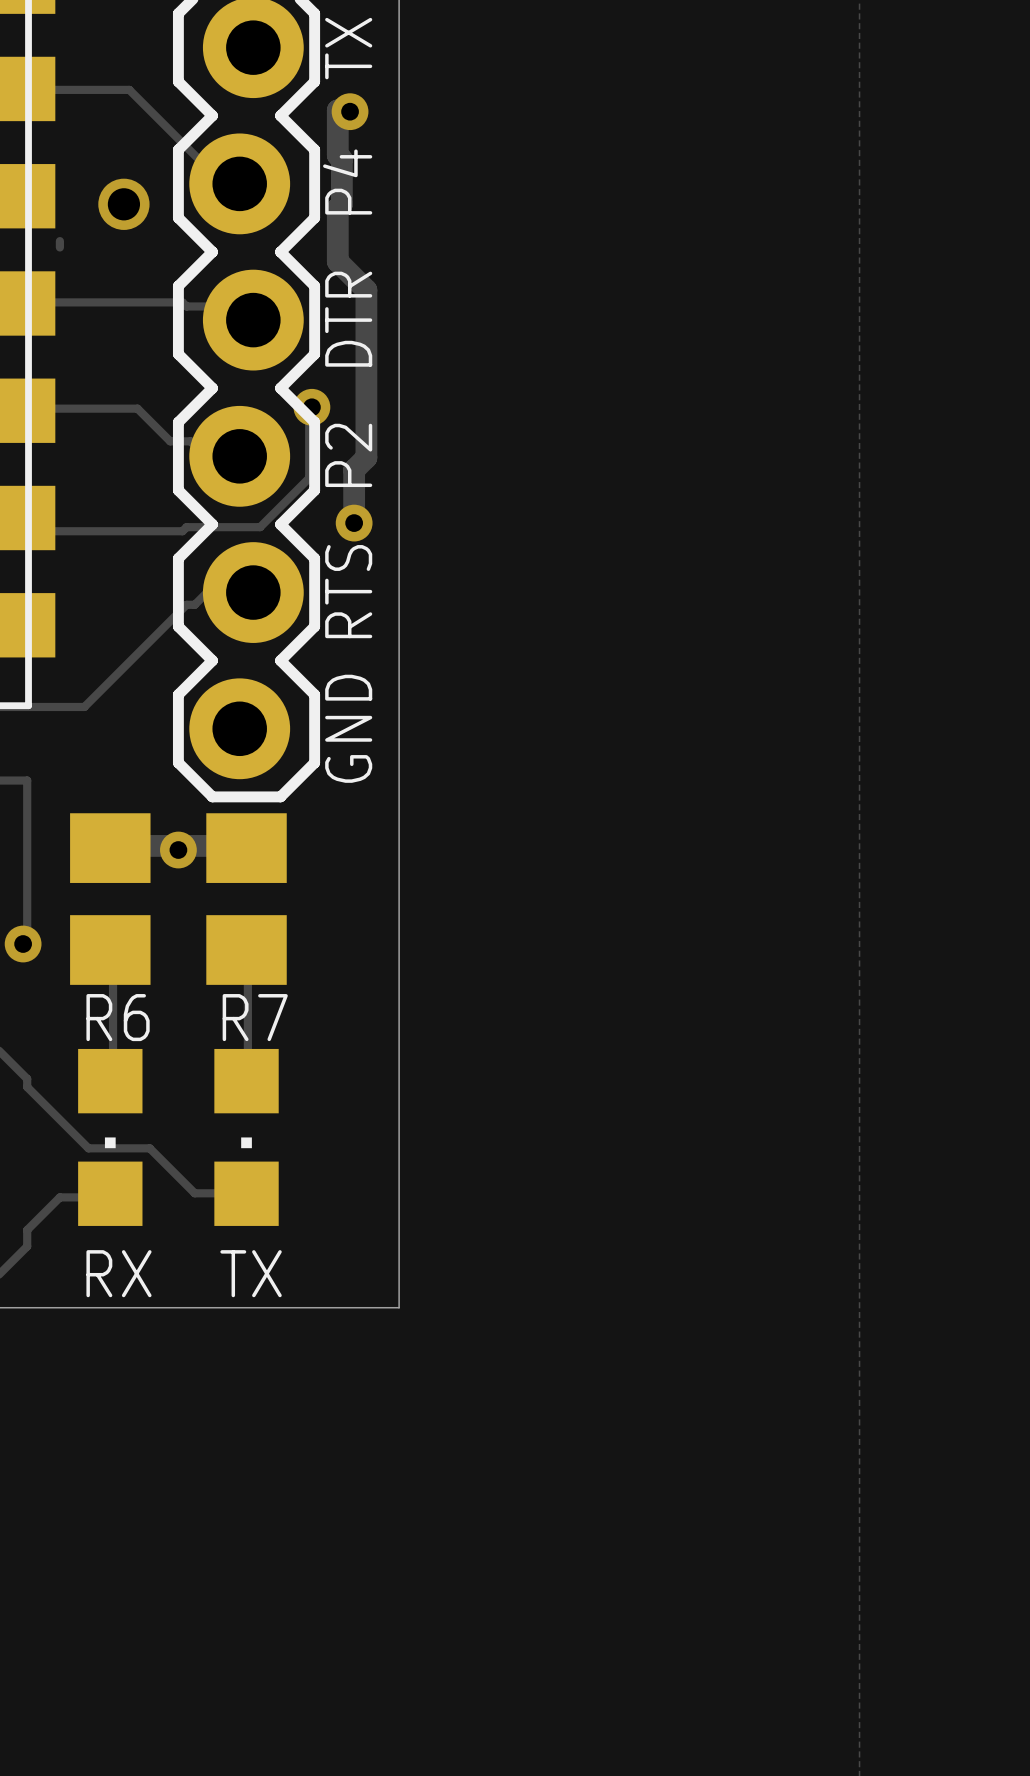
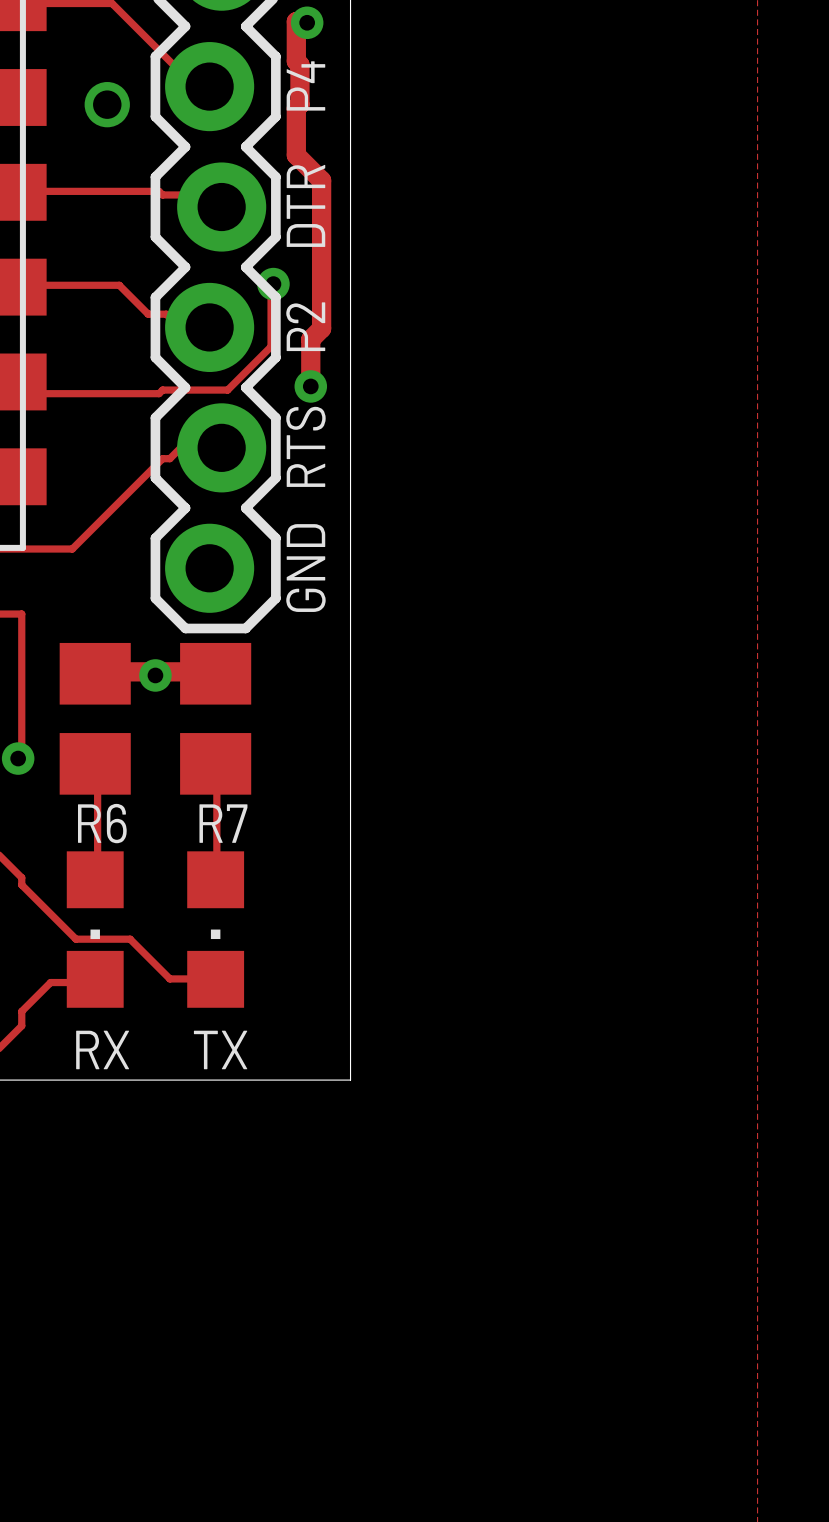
track: (59, 241) (59, 247) -> none

